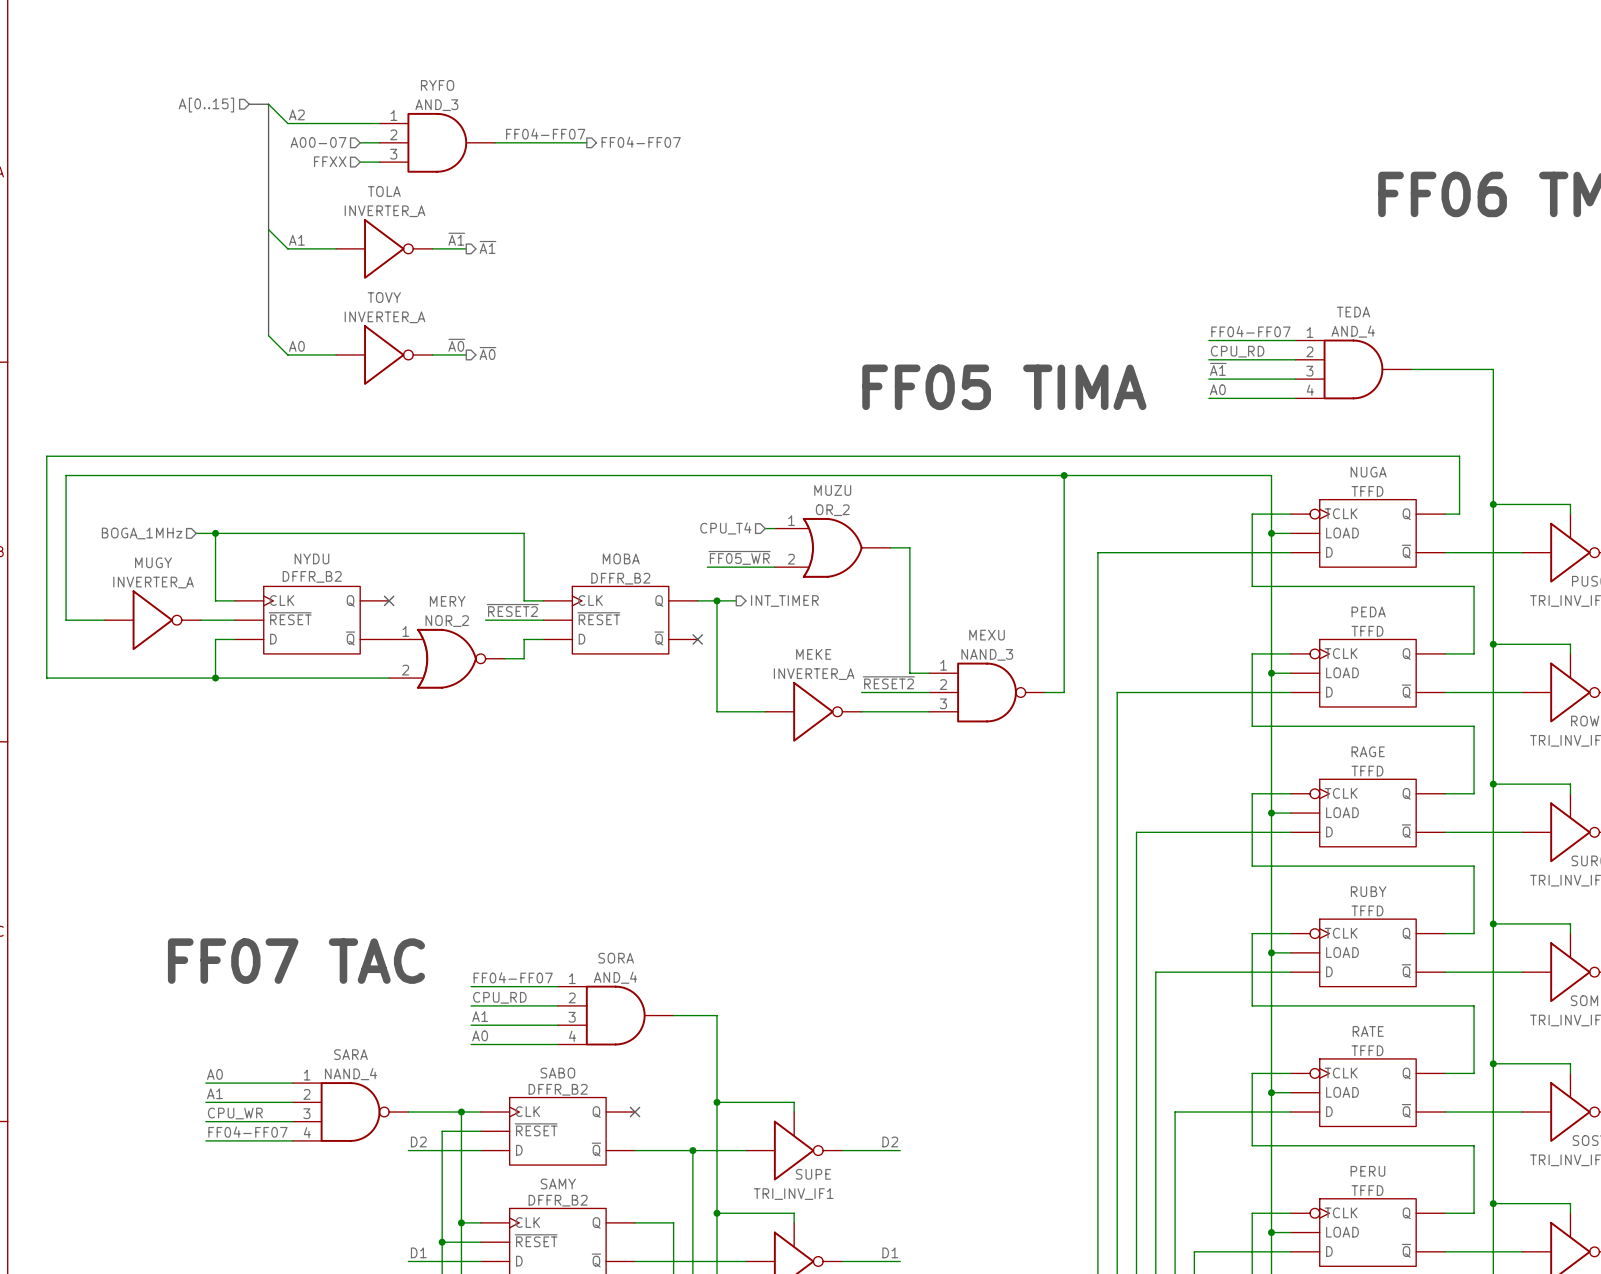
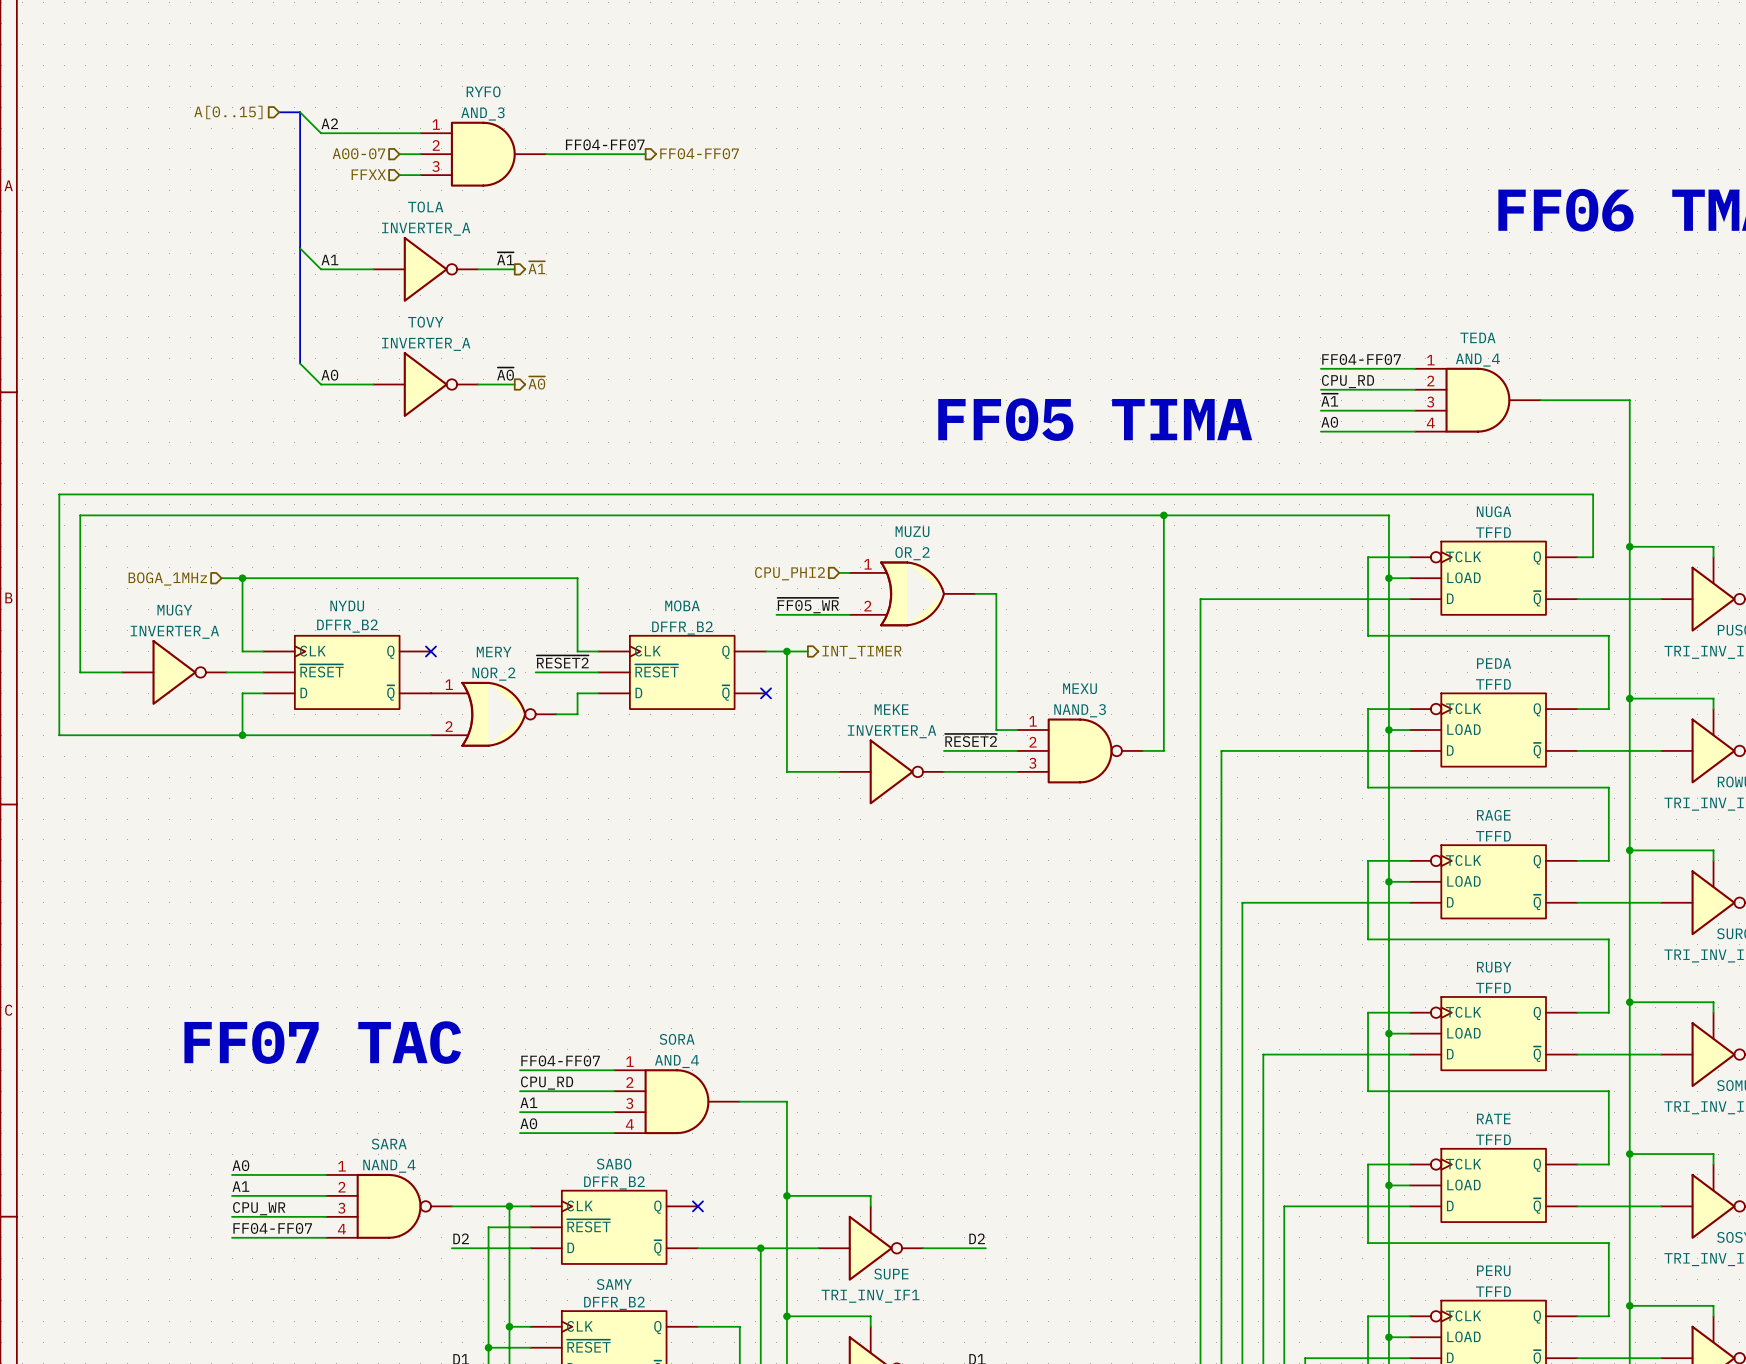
hierarchical label: CPU_T4 (725, 528) -> CPU_PHI2 (790, 573)

